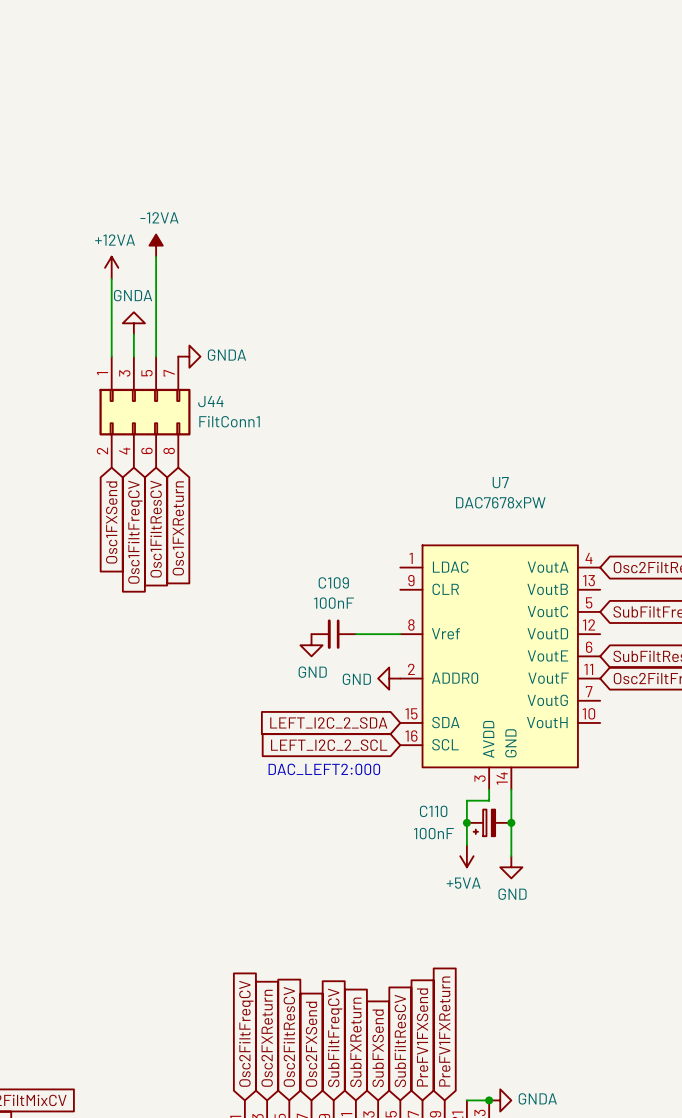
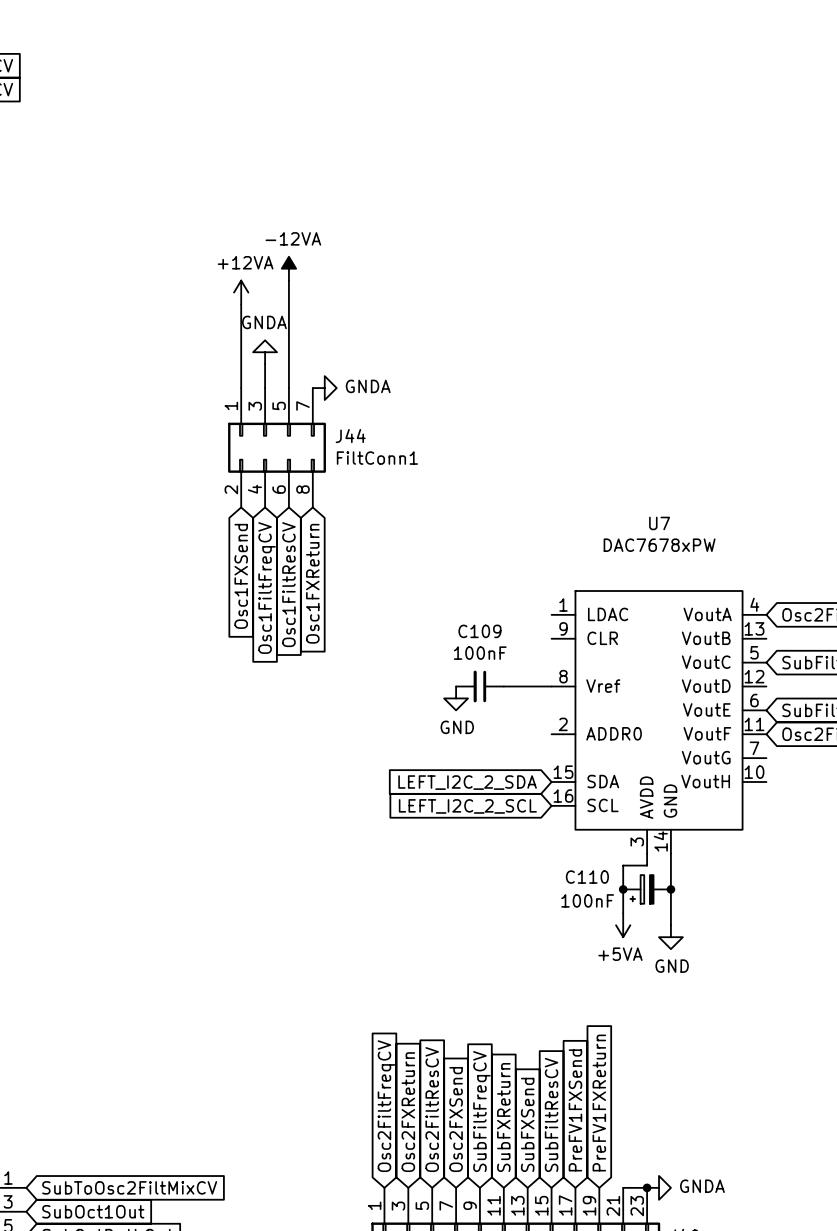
power symbol: GND (389, 678) -> none
text: DAC_LEFT2:000 (324, 769) -> none

